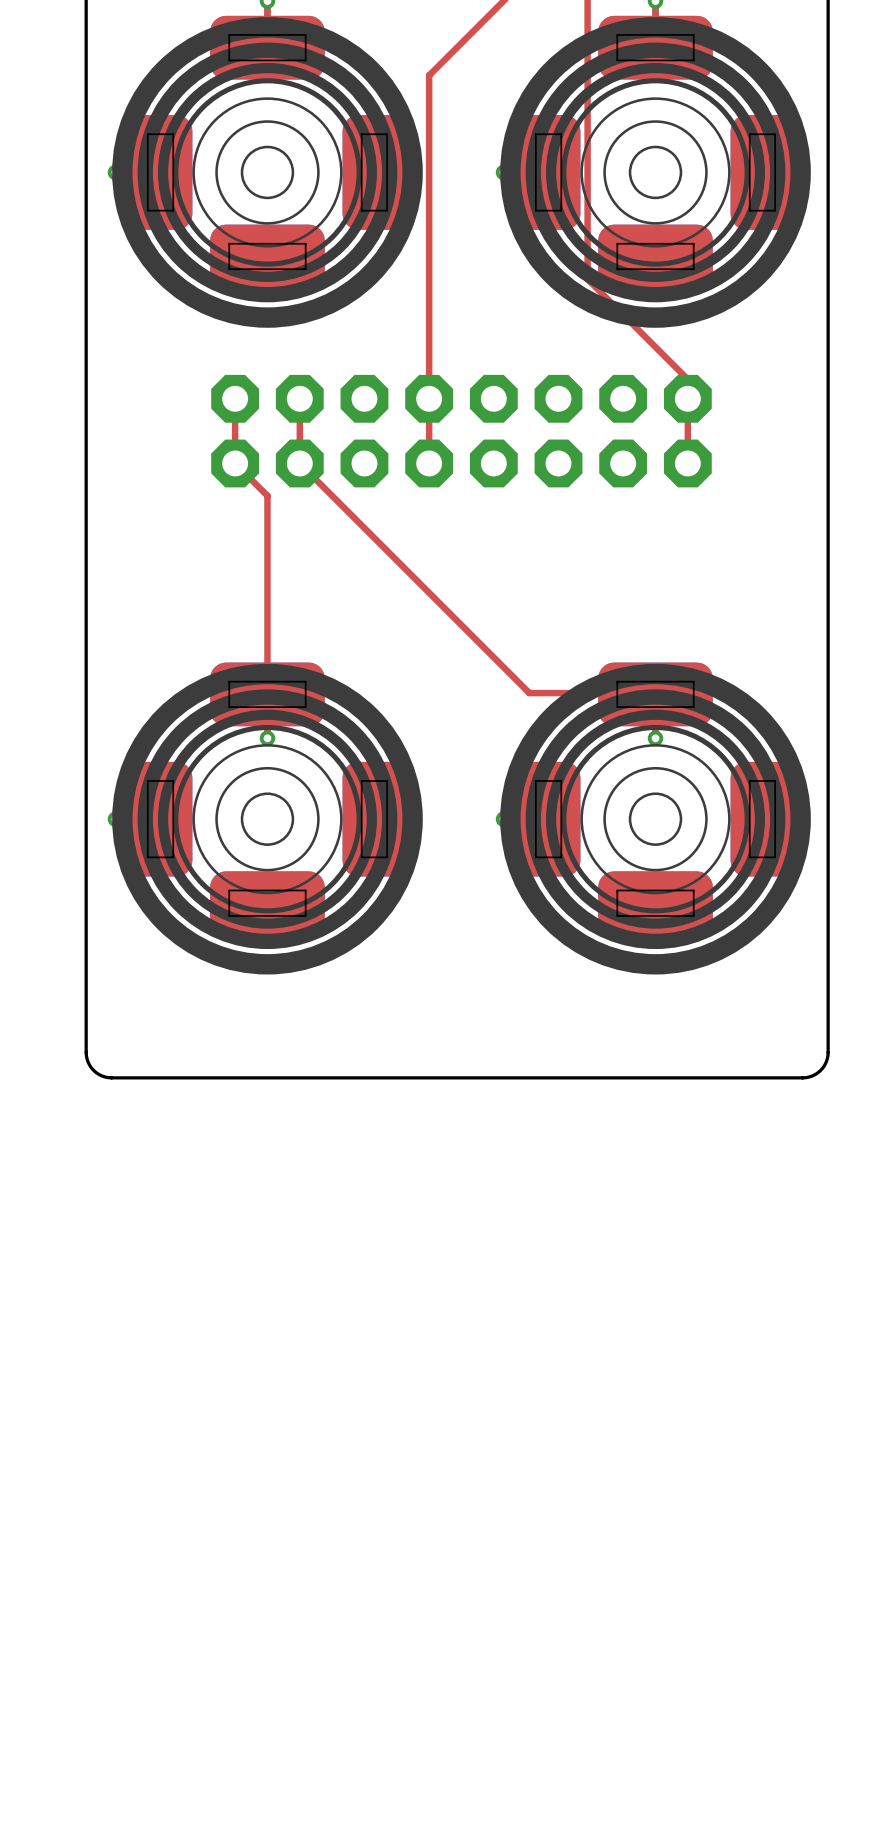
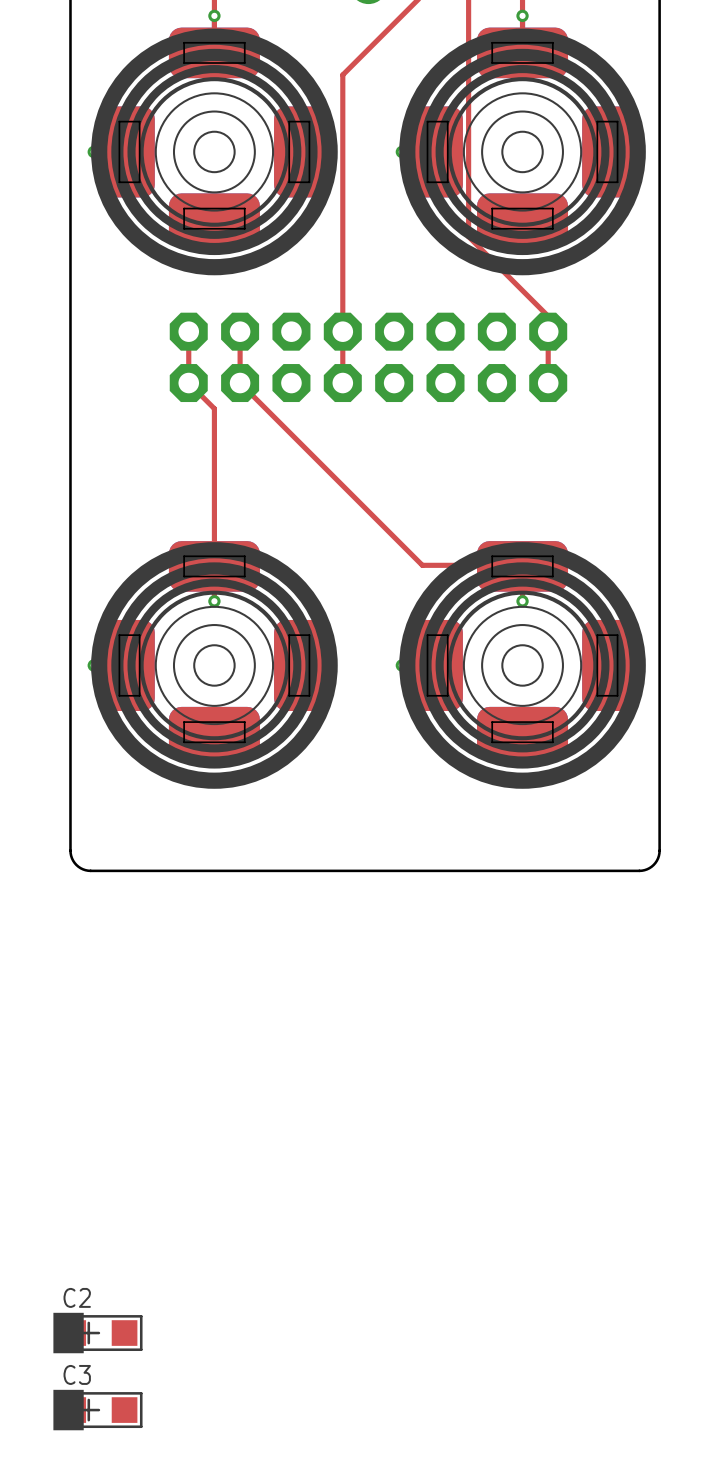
C2: none -> (97, 1333)
C3: none -> (97, 1410)

